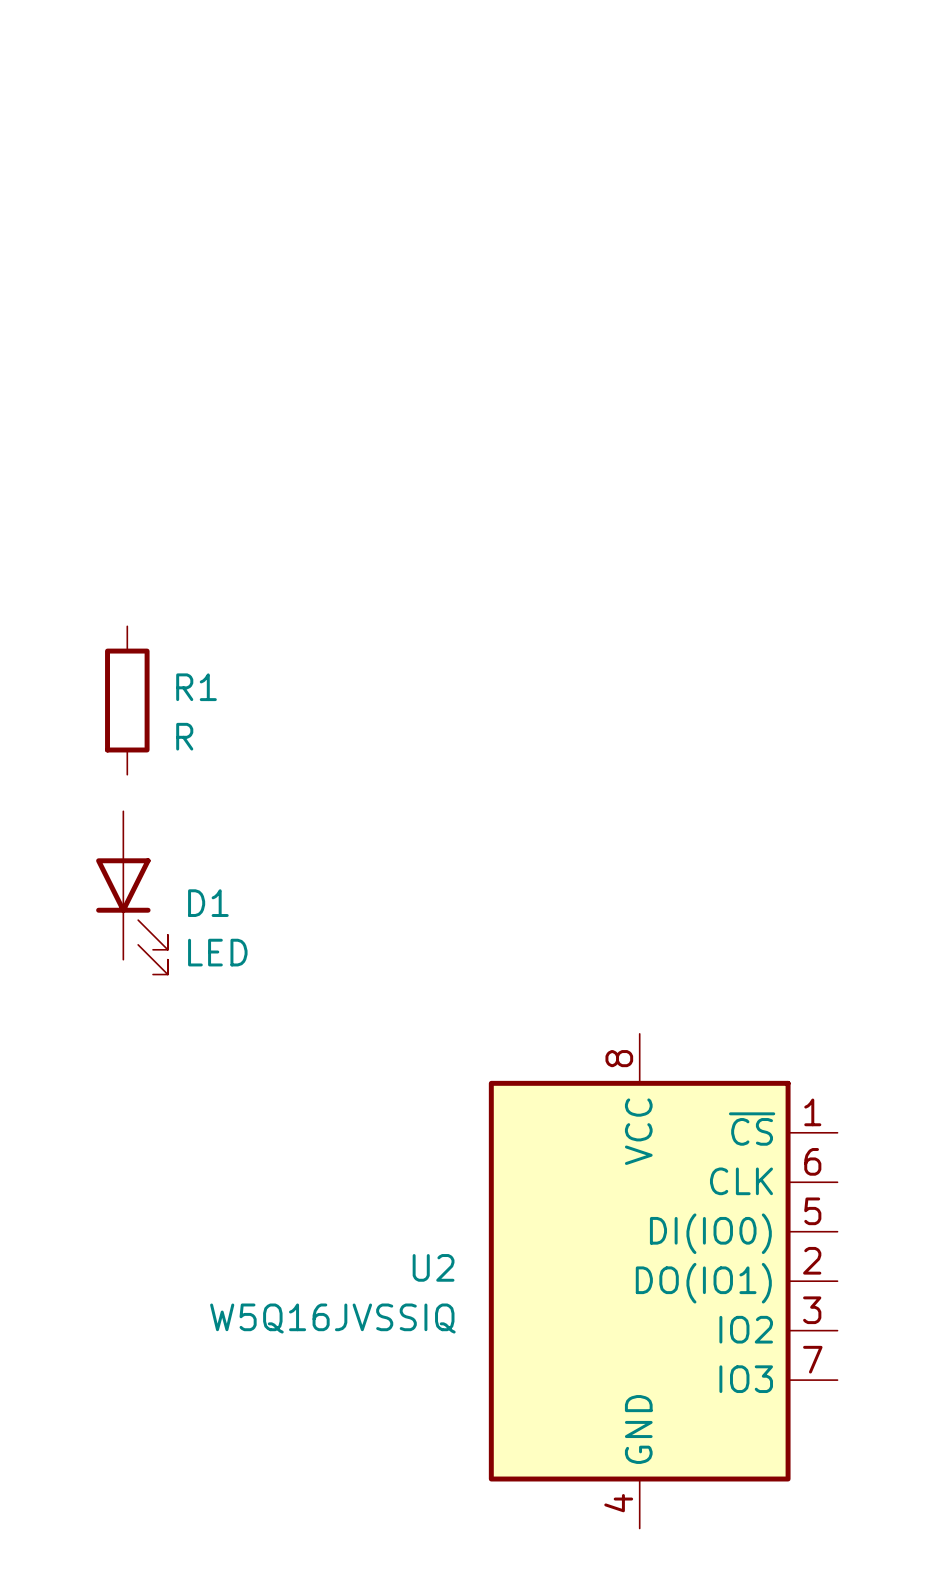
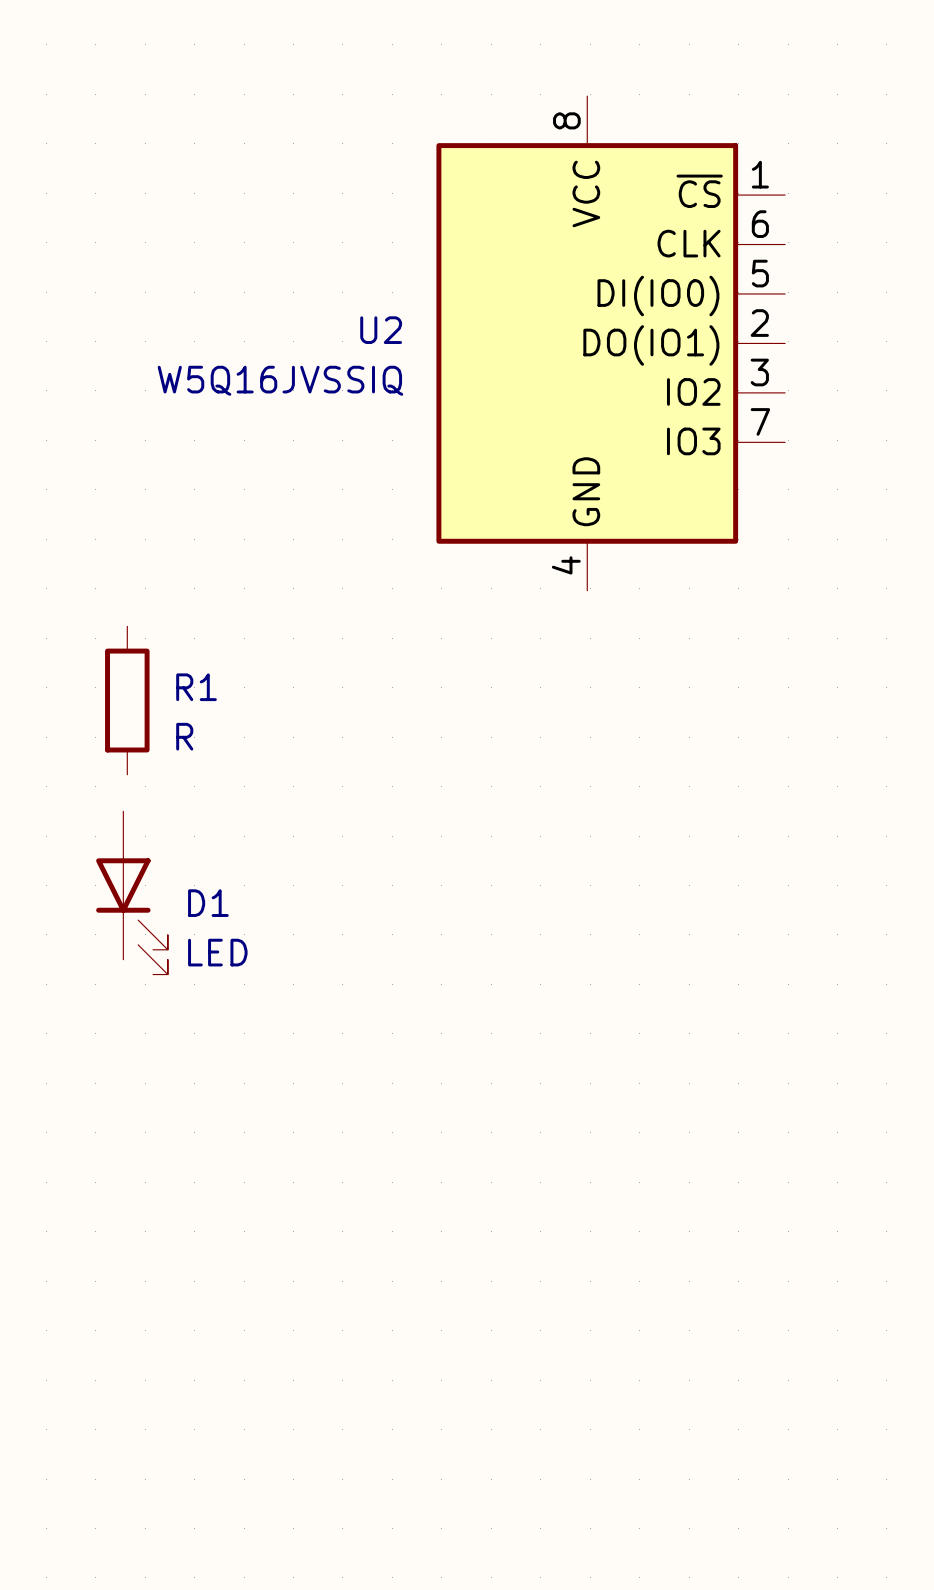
U2 position: (663, 1281) -> (610, 343)

